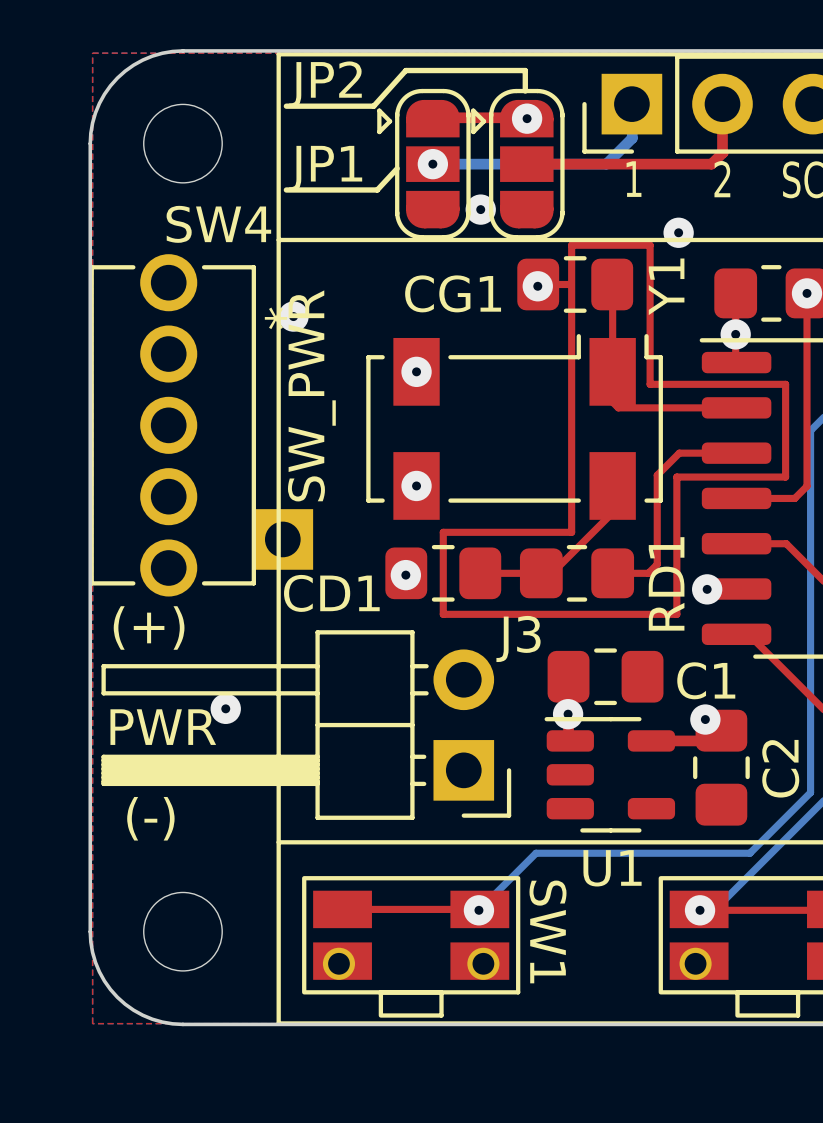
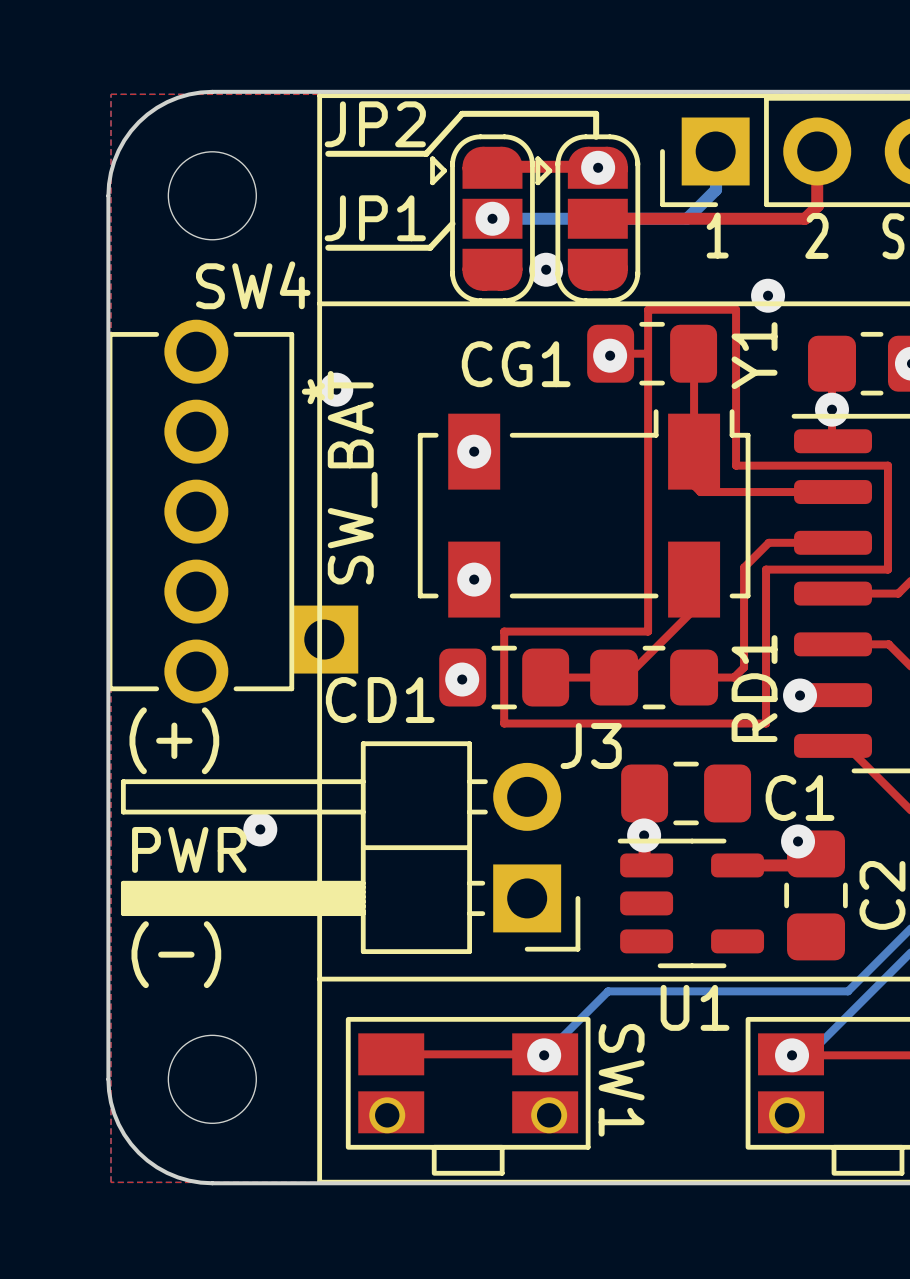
SW4 value: SW_PWR (311, 395) -> SW_BAT (352, 477)

